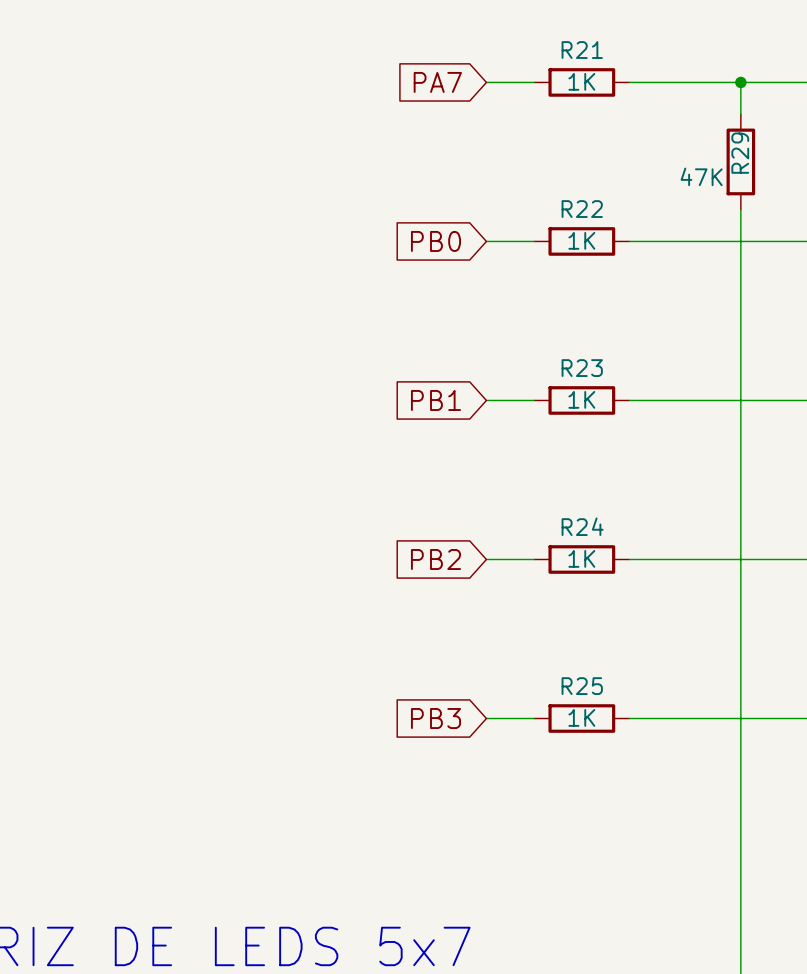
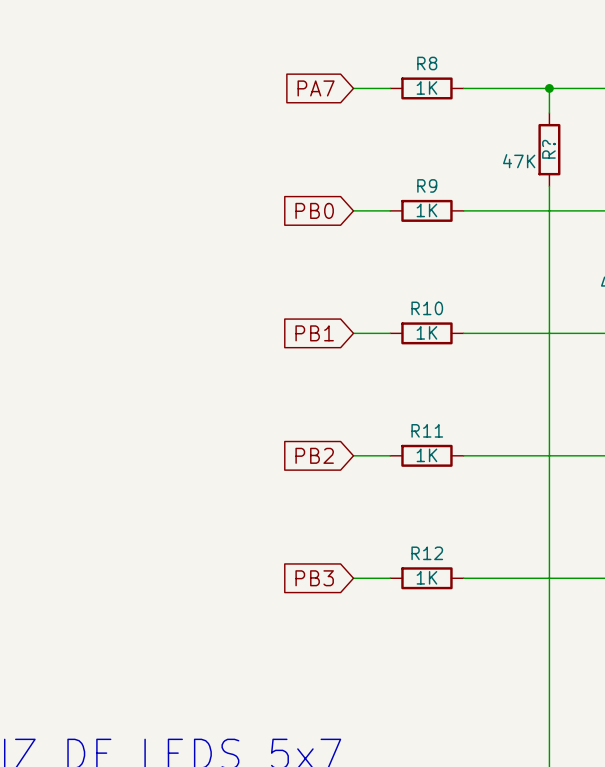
R21 name: R21 (582, 50) -> R8 (427, 63)
R29 name: R29 (740, 153) -> R? (548, 149)
R22 name: R22 (582, 209) -> R9 (427, 185)
R23 name: R23 (582, 368) -> R10 (427, 308)
R24 name: R24 (582, 526) -> R11 (427, 430)
R25 name: R25 (582, 686) -> R12 (427, 553)

